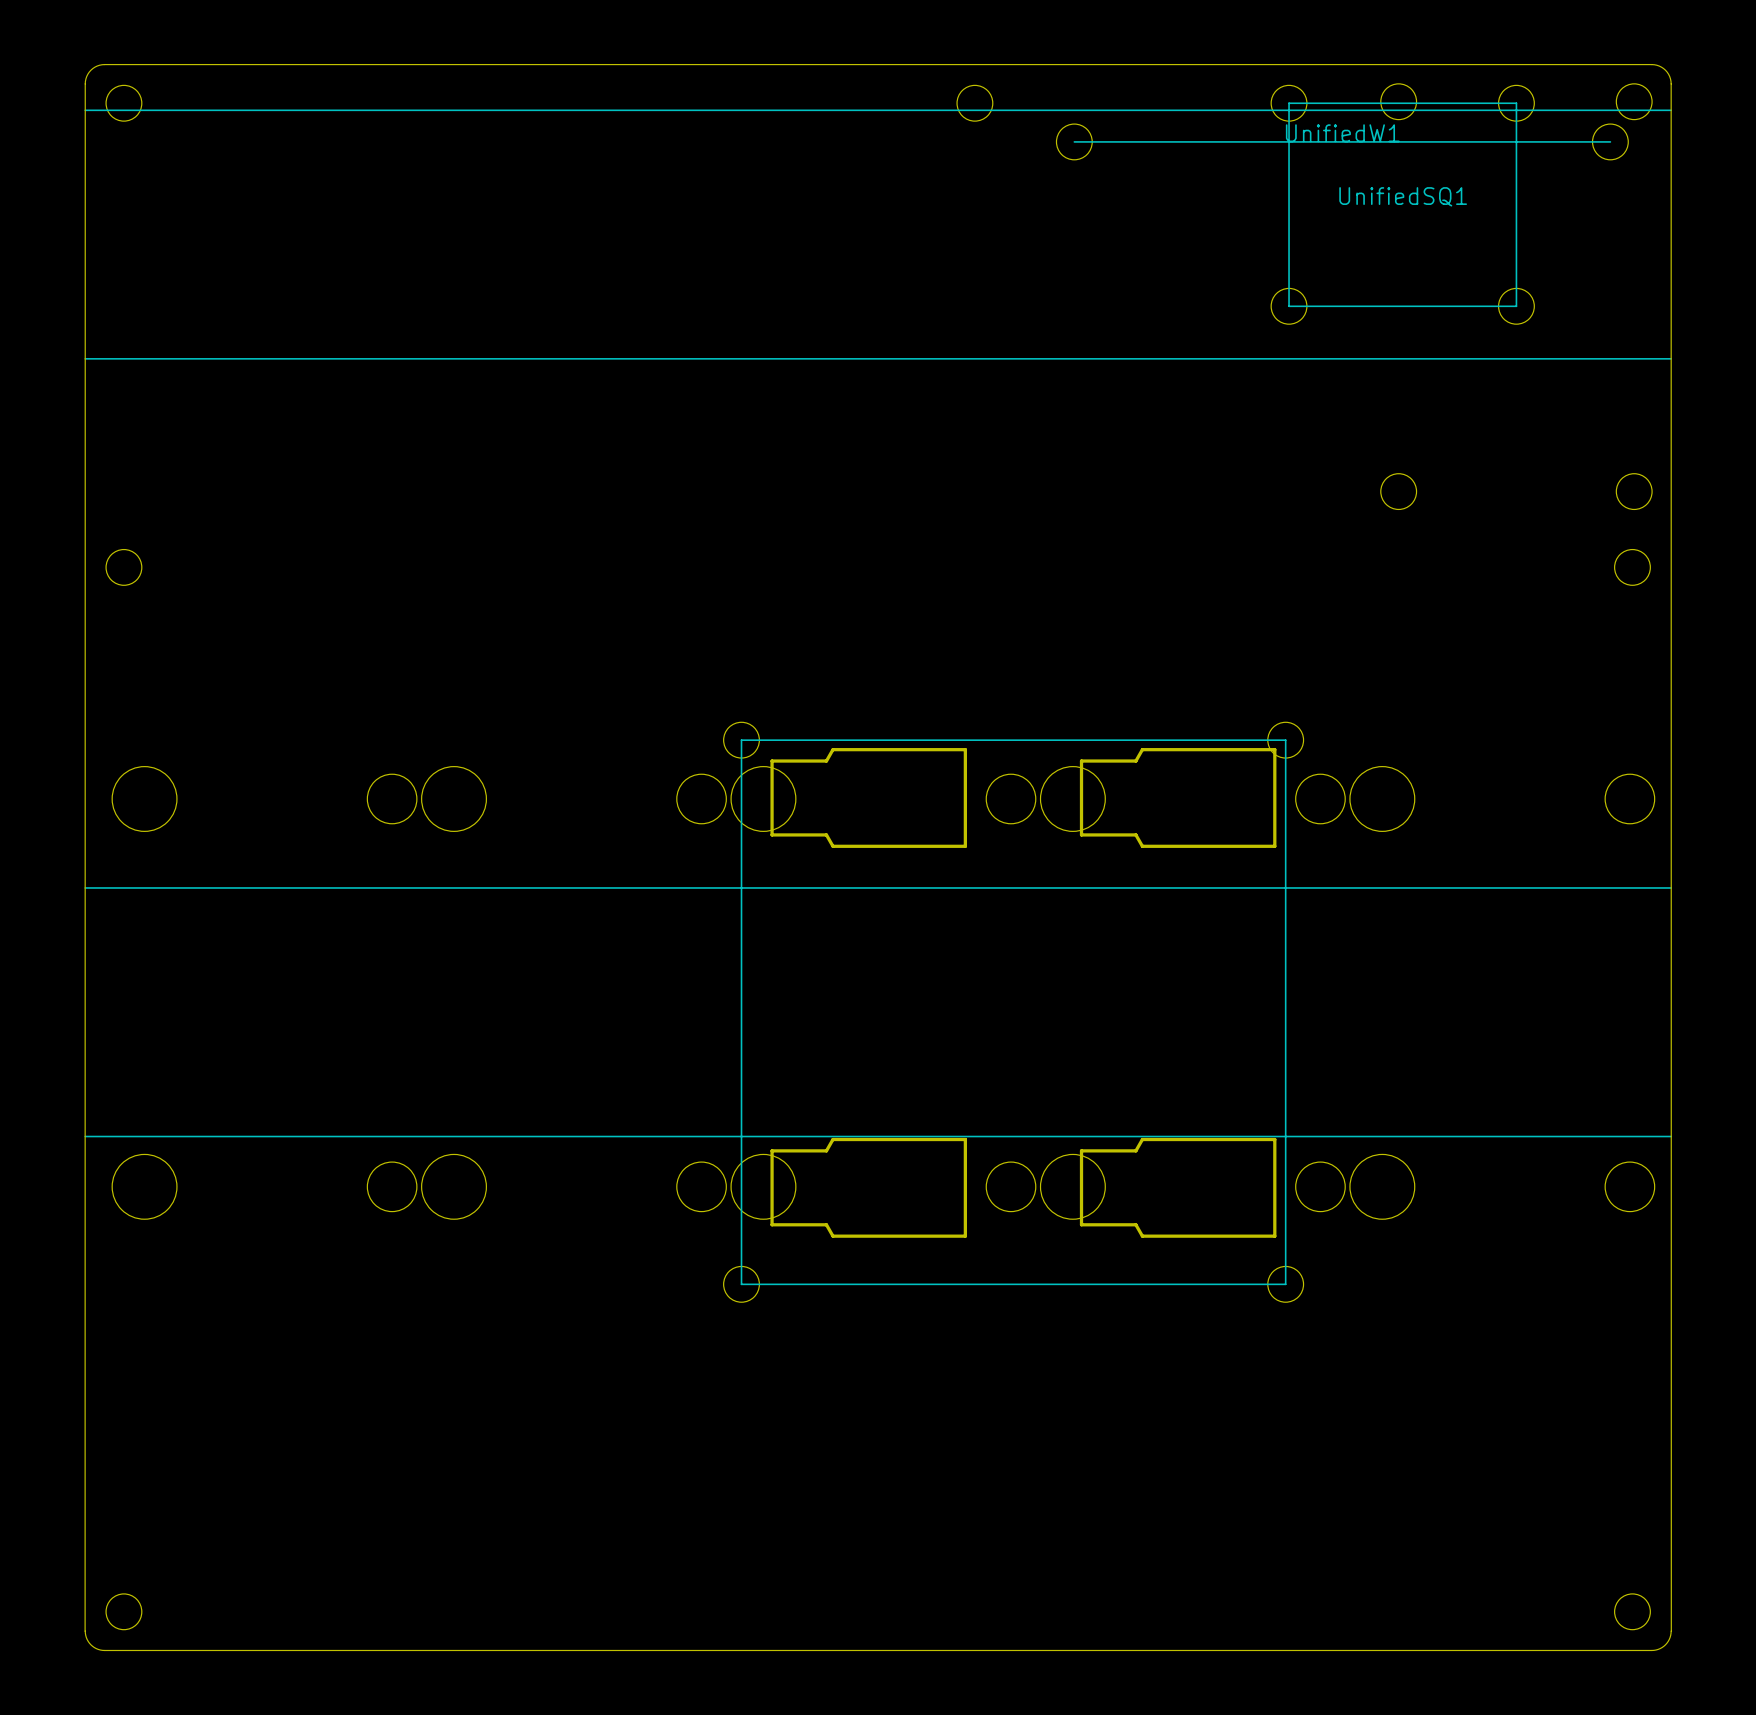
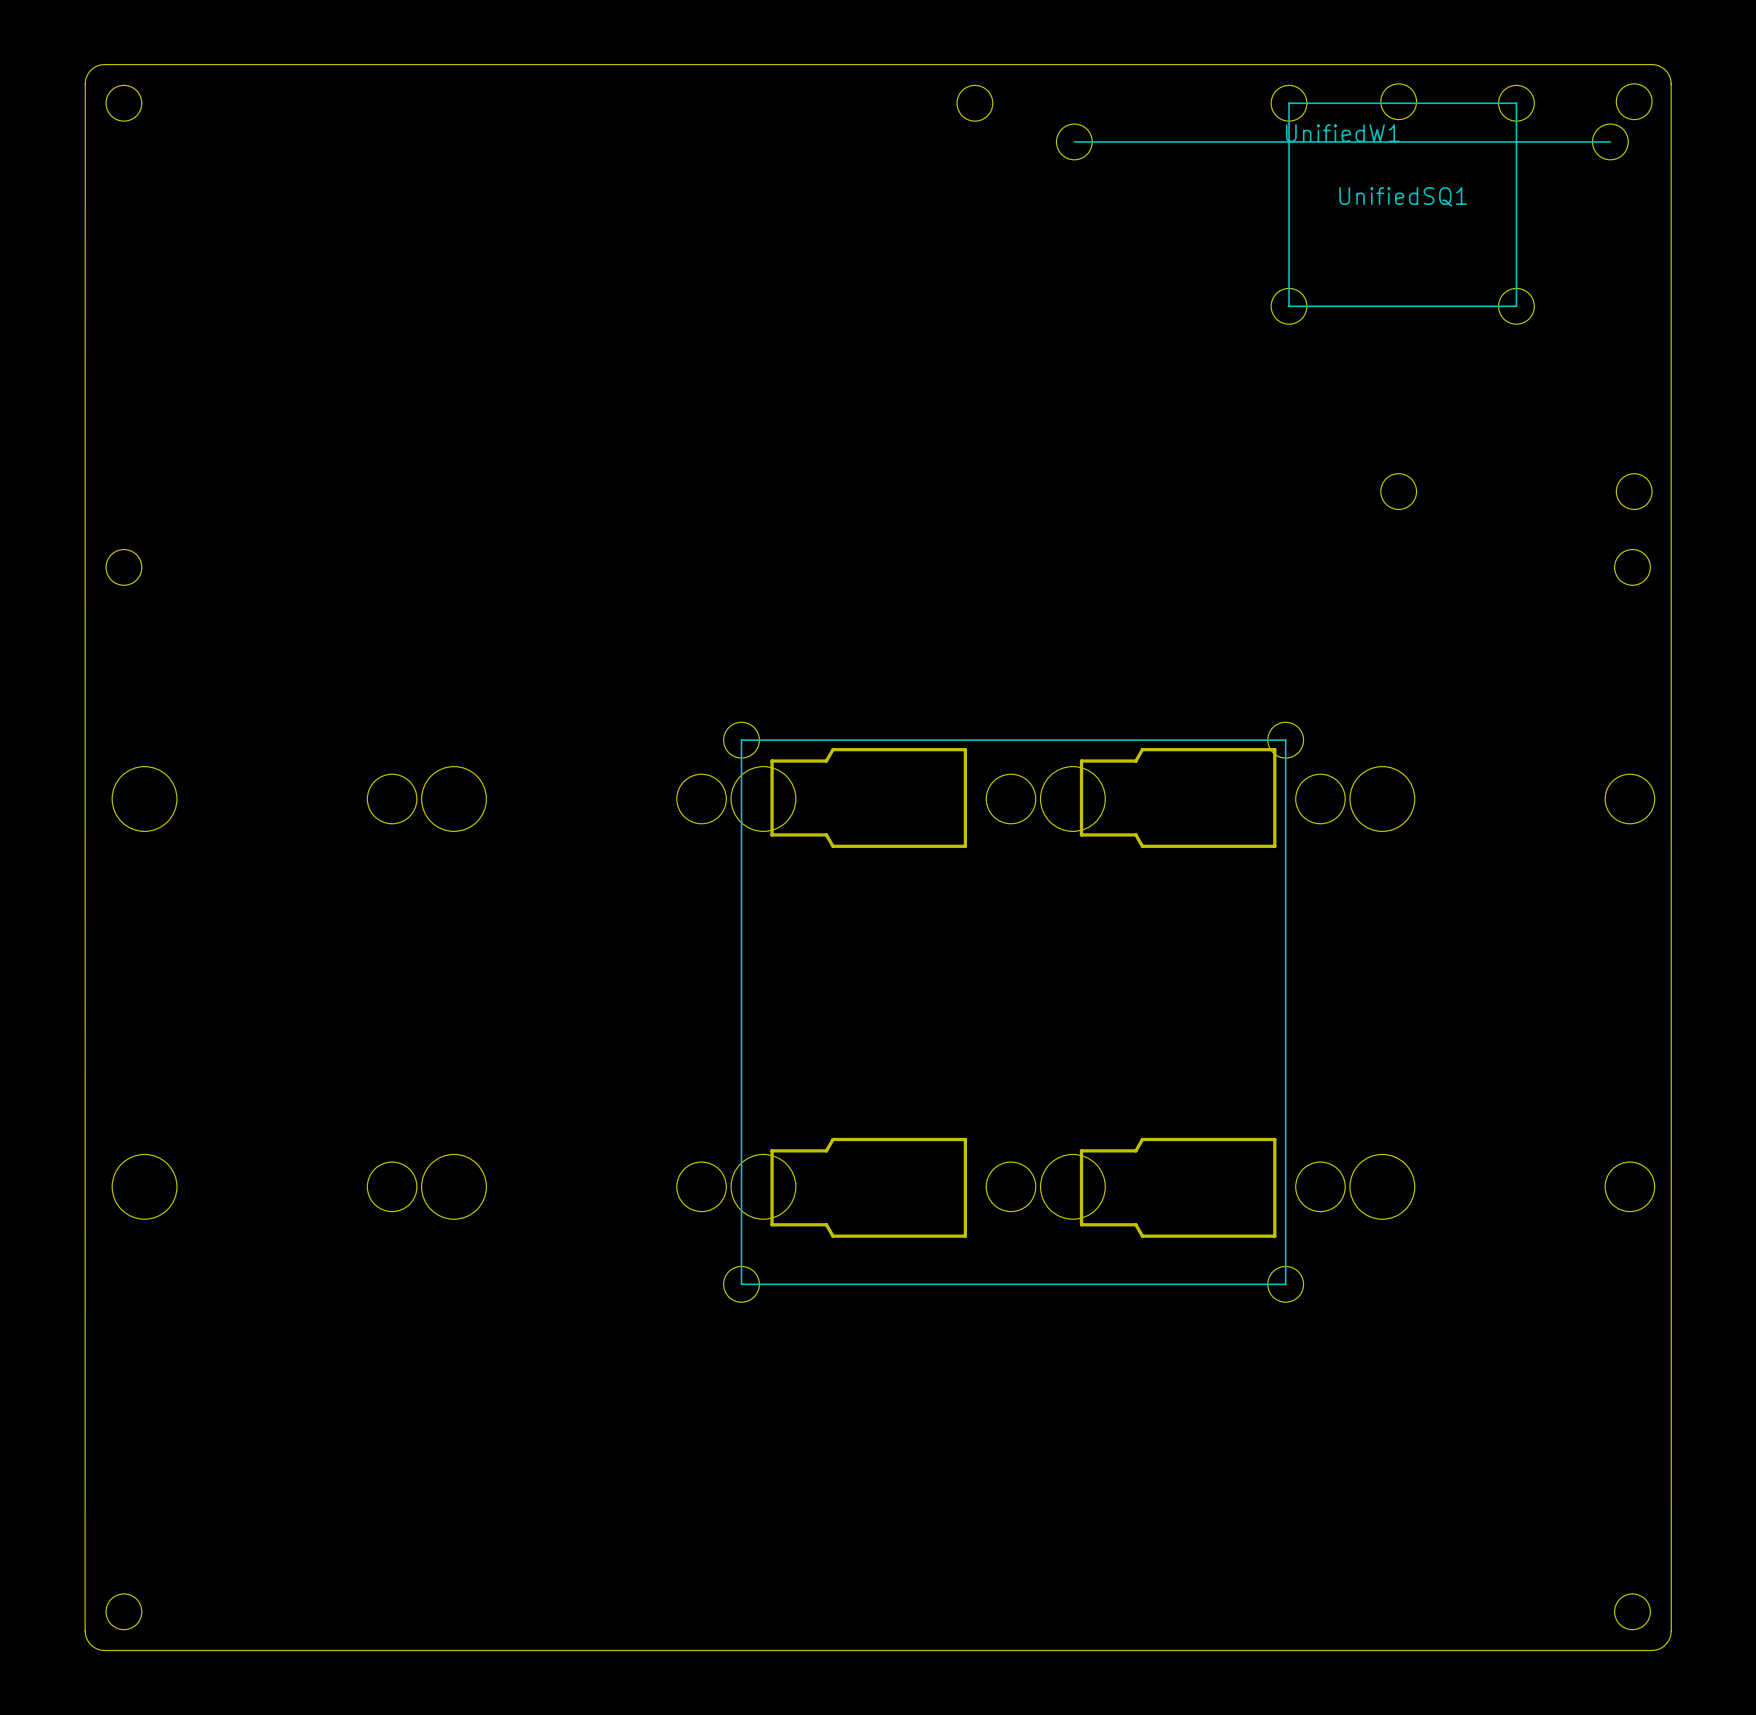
line: (85, 110) (1671, 110) -> none
line: (85, 358) (1671, 358) -> none
line: (85, 887) (1671, 887) -> none
line: (85, 1136) (1671, 1136) -> none

